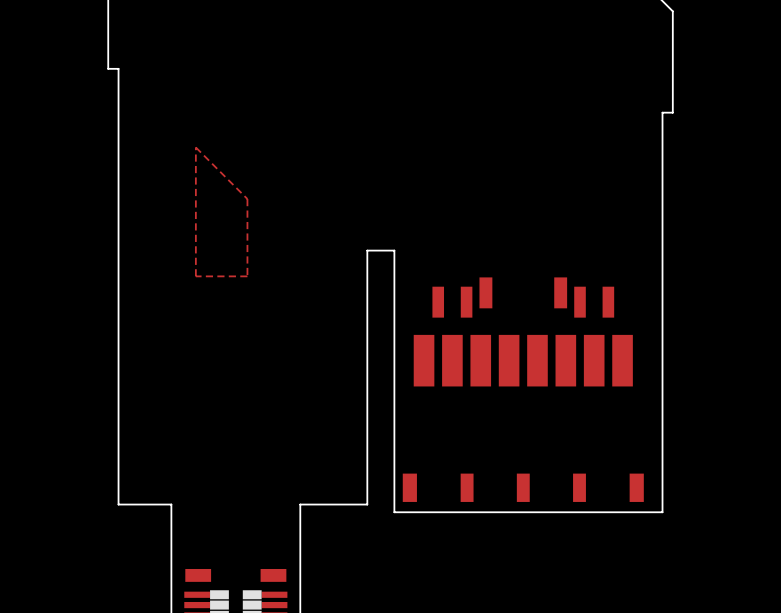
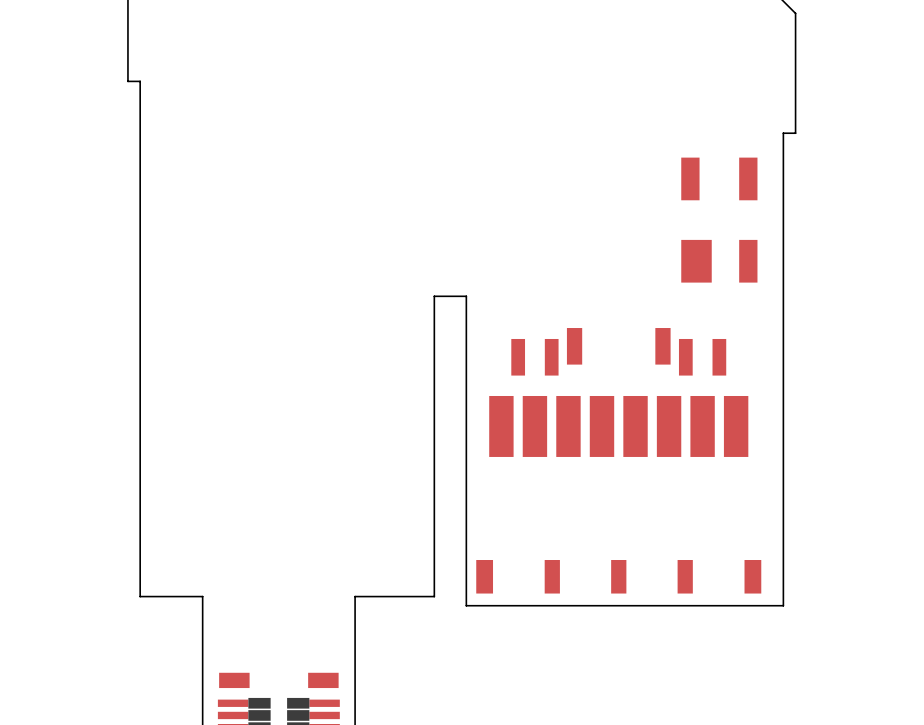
zone outline: (195, 147) (247, 199) (247, 276) (195, 276) (195, 147) -> none
part: none -> (719, 220)

